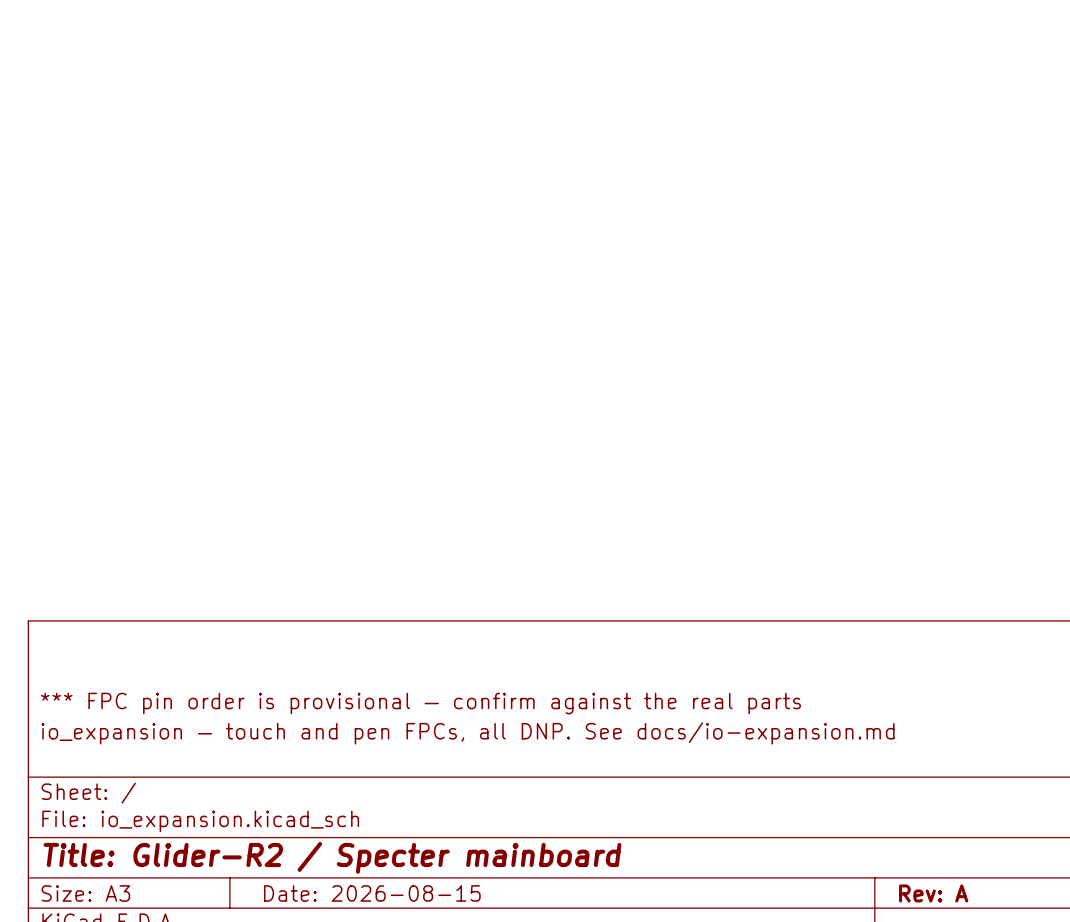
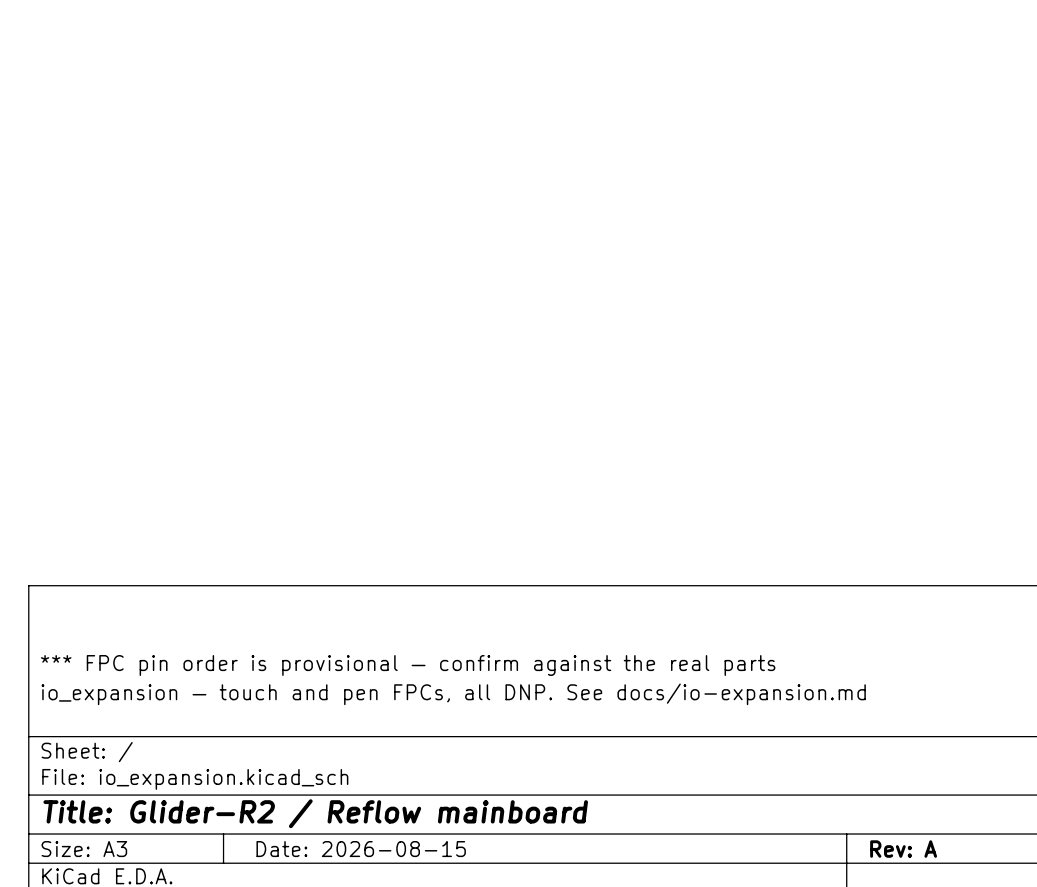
title block: Title: Glider-R2 / Specter mainboard (332, 857) -> Title: Glider-R2 / Reflow mainboard (315, 813)

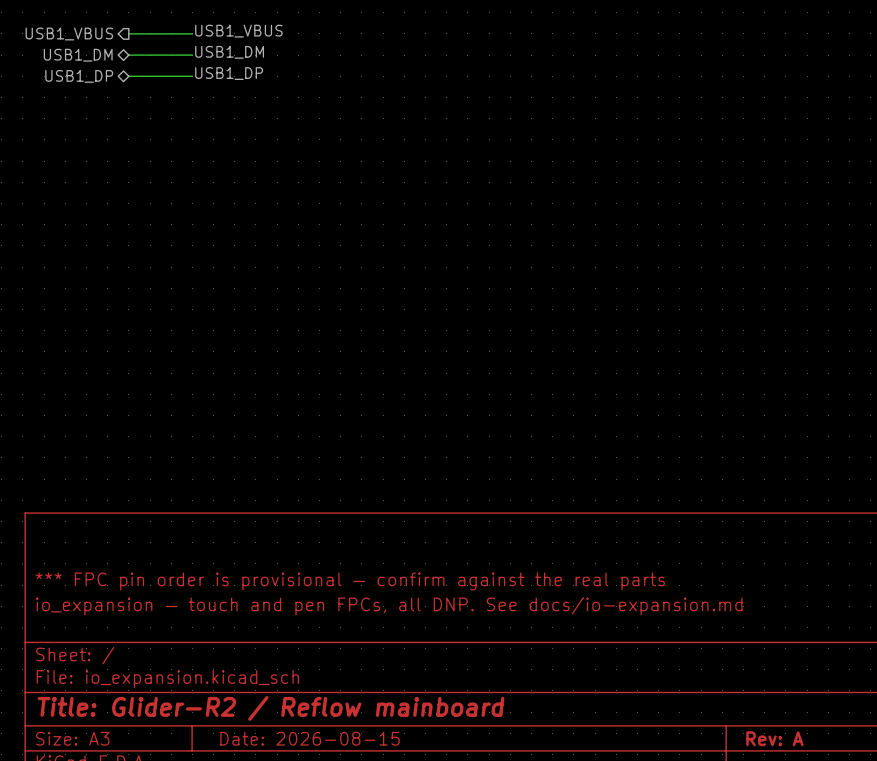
label: none -> USB1_VBUS (238, 31)
hierarchical label: none -> USB1_VBUS (69, 34)
wire: none -> (128, 33) (192, 33)
label: none -> USB1_DM (229, 52)
hierarchical label: none -> USB1_DM (78, 55)
wire: none -> (128, 55) (192, 55)
label: none -> USB1_DP (229, 73)
hierarchical label: none -> USB1_DP (79, 76)
wire: none -> (128, 76) (192, 76)

